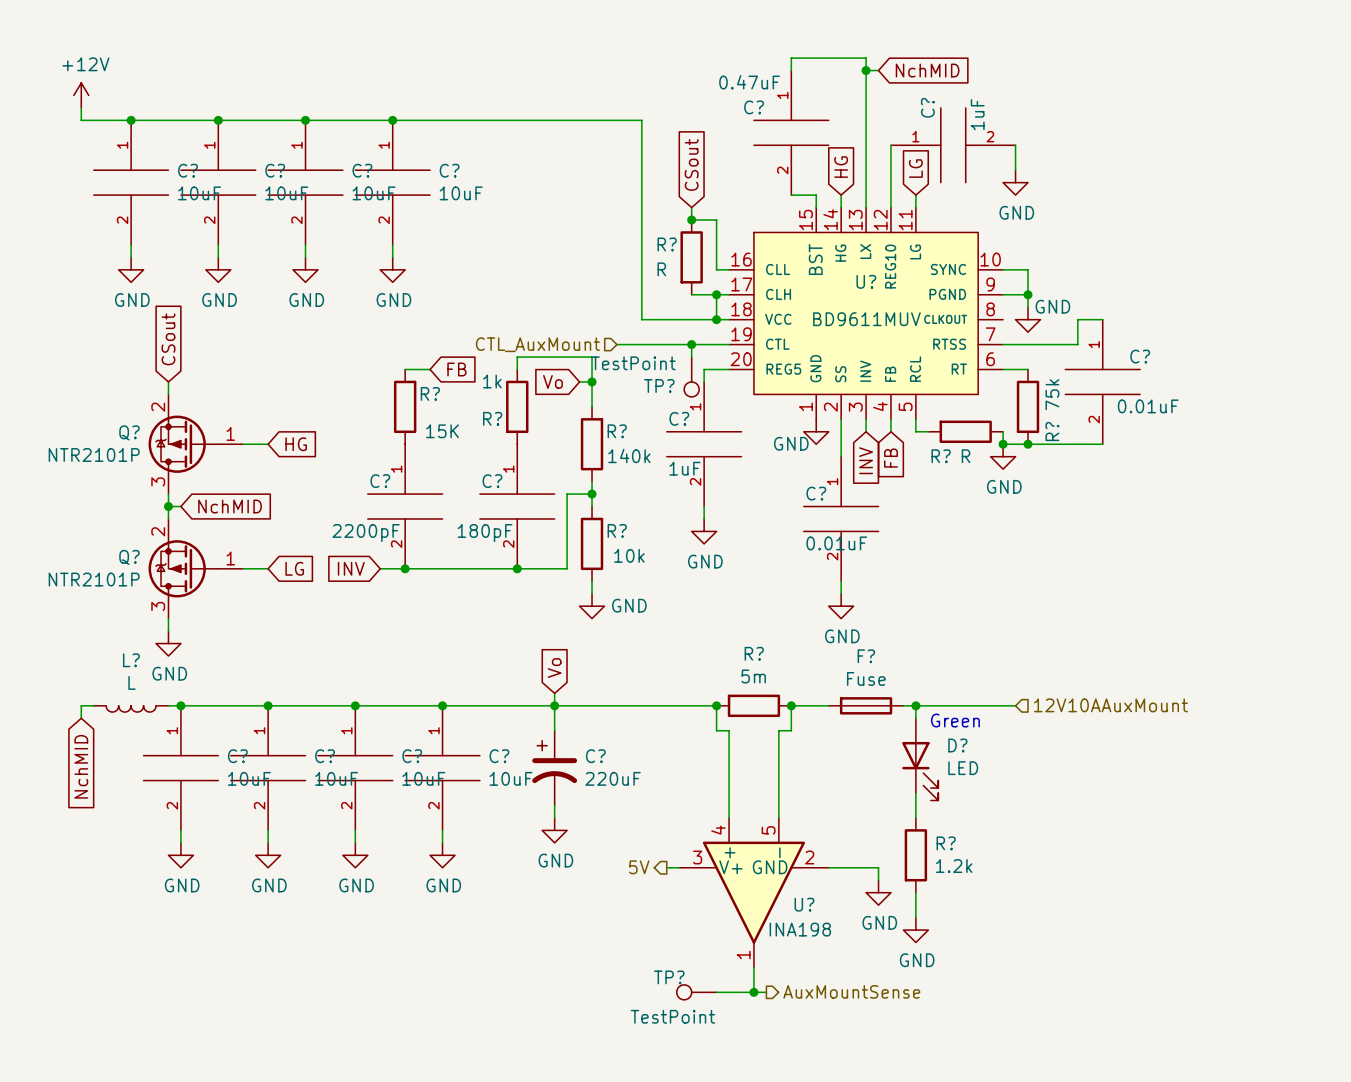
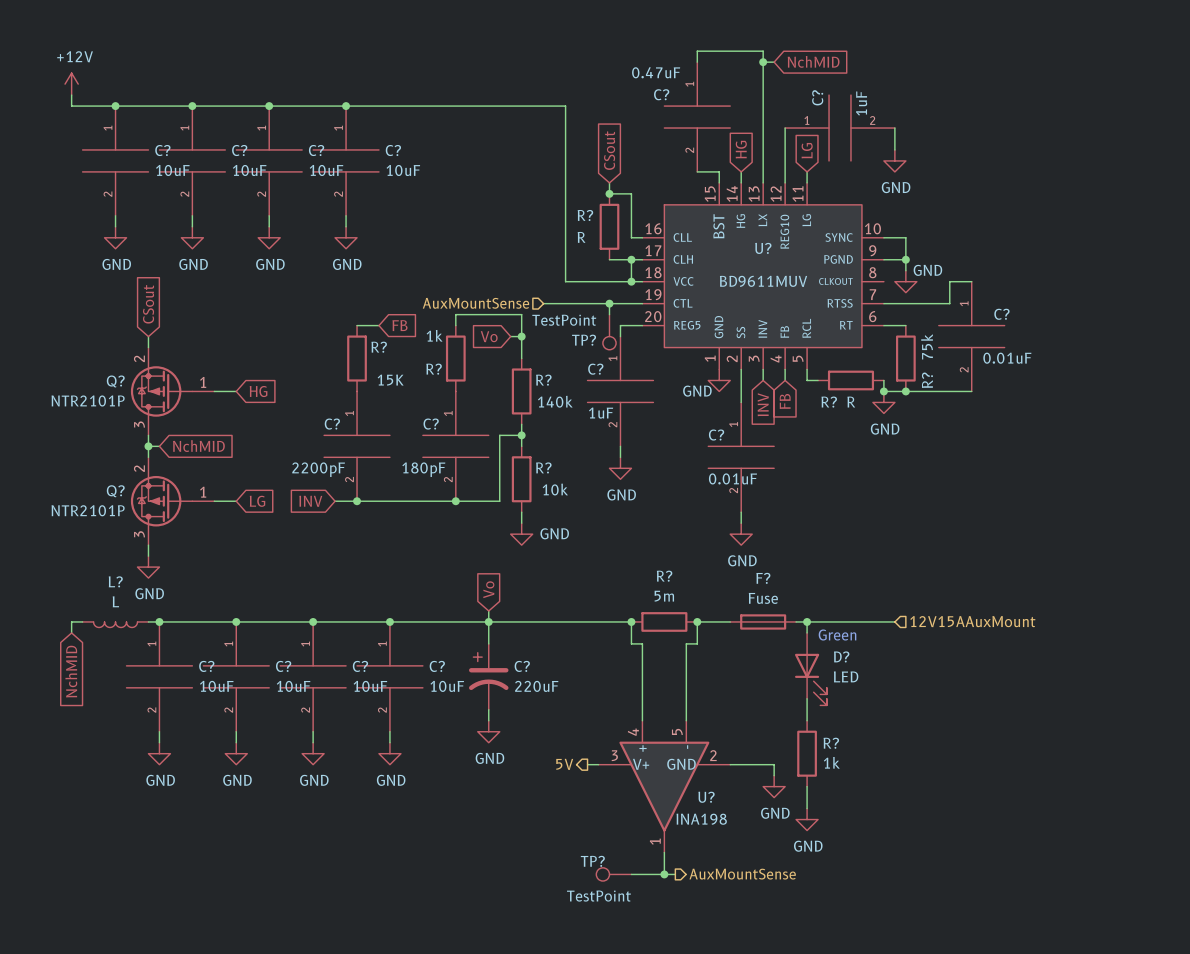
hierarchical label: CTL_AuxMount (537, 344) -> AuxMountSense (475, 303)
hierarchical label: 12V10AAuxMount (1110, 705) -> 12V15AAuxMount (972, 621)
R? value: 1.2k (954, 866) -> 1k (831, 762)

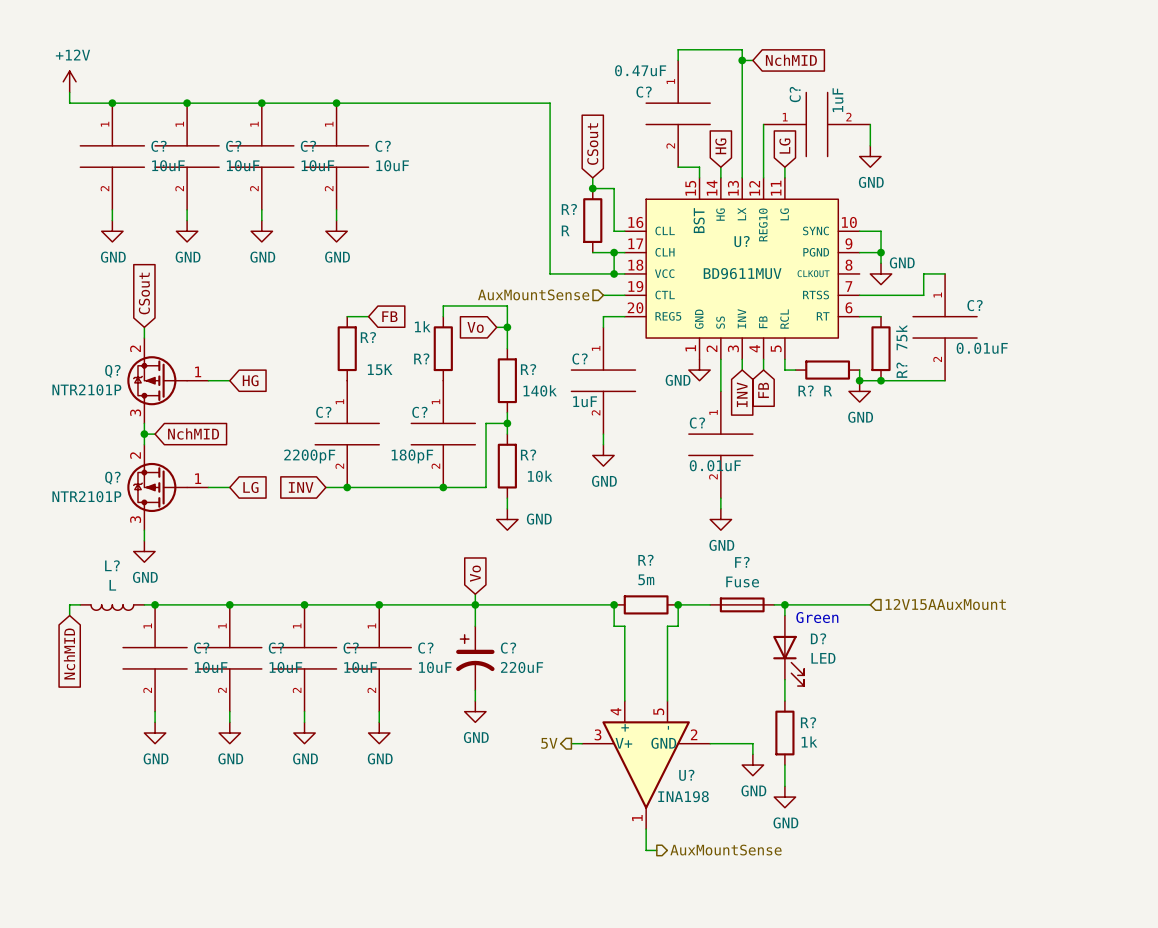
hierarchical label position: AuxMountSense (475, 303) -> AuxMountSense (533, 294)
wire: (543, 303) (620, 303) -> none
wire: (609, 303) (609, 314) -> none
junction: (609, 303) -> none
TP?: TestPoint (609, 332) -> none
TP?: TestPoint (613, 874) -> none
wire: (631, 874) (664, 874) -> none
junction: (664, 874) -> none

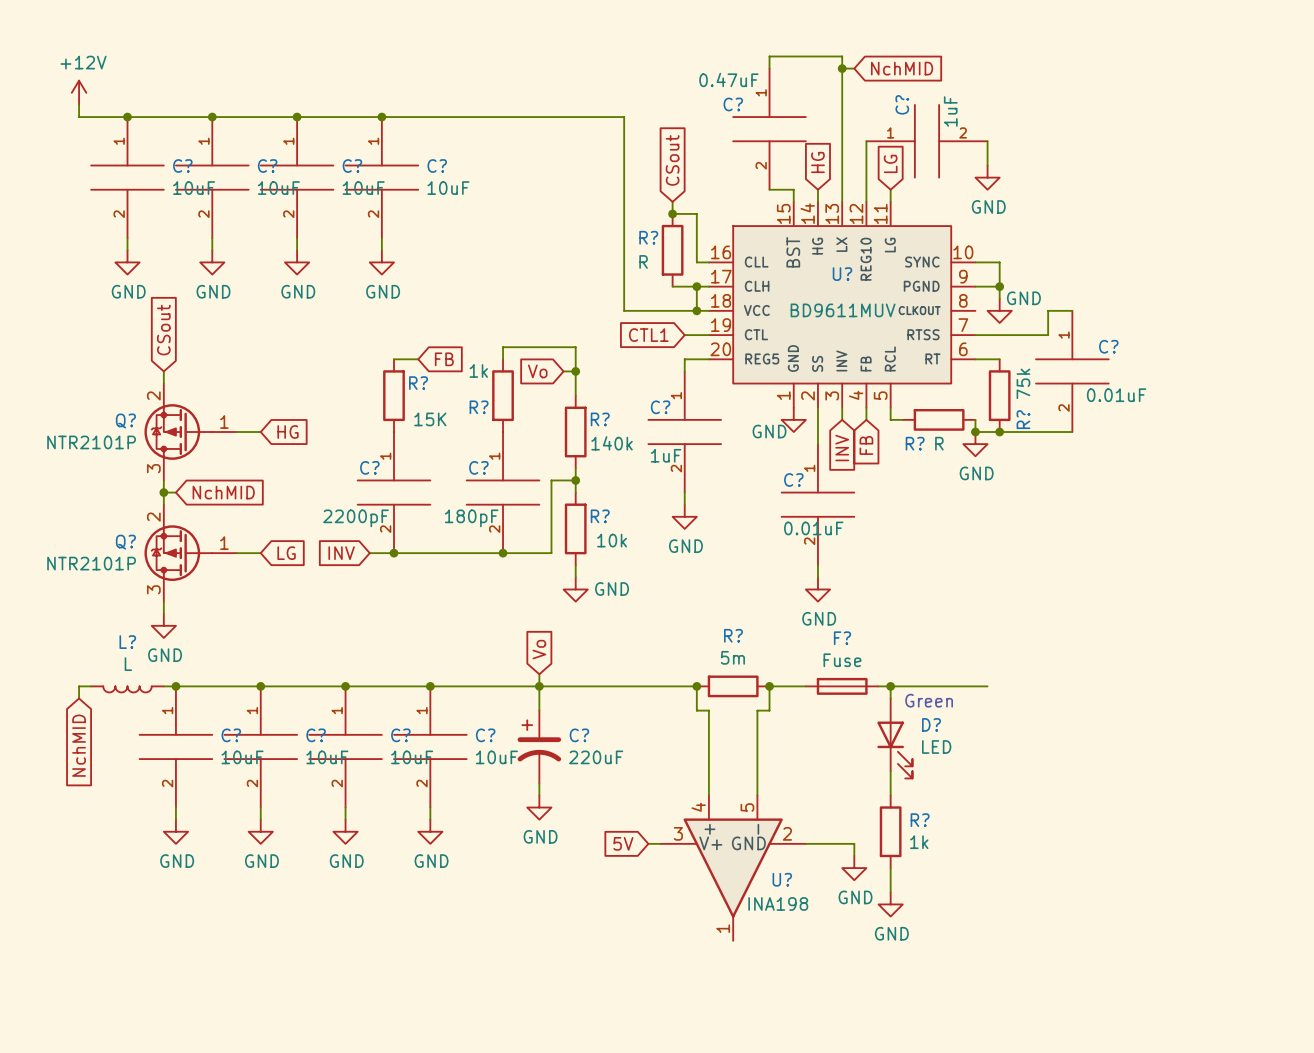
hierarchical label: AuxMountSense (533, 294) -> none
global label: none -> CTL1 (648, 335)
hierarchical label: 12V15AAuxMount (945, 604) -> none
hierarchical label: 5V (549, 743) -> none
global label: none -> 5V (623, 843)
wire: (646, 829) (646, 850) (656, 850) -> none
hierarchical label: AuxMountSense (725, 850) -> none

